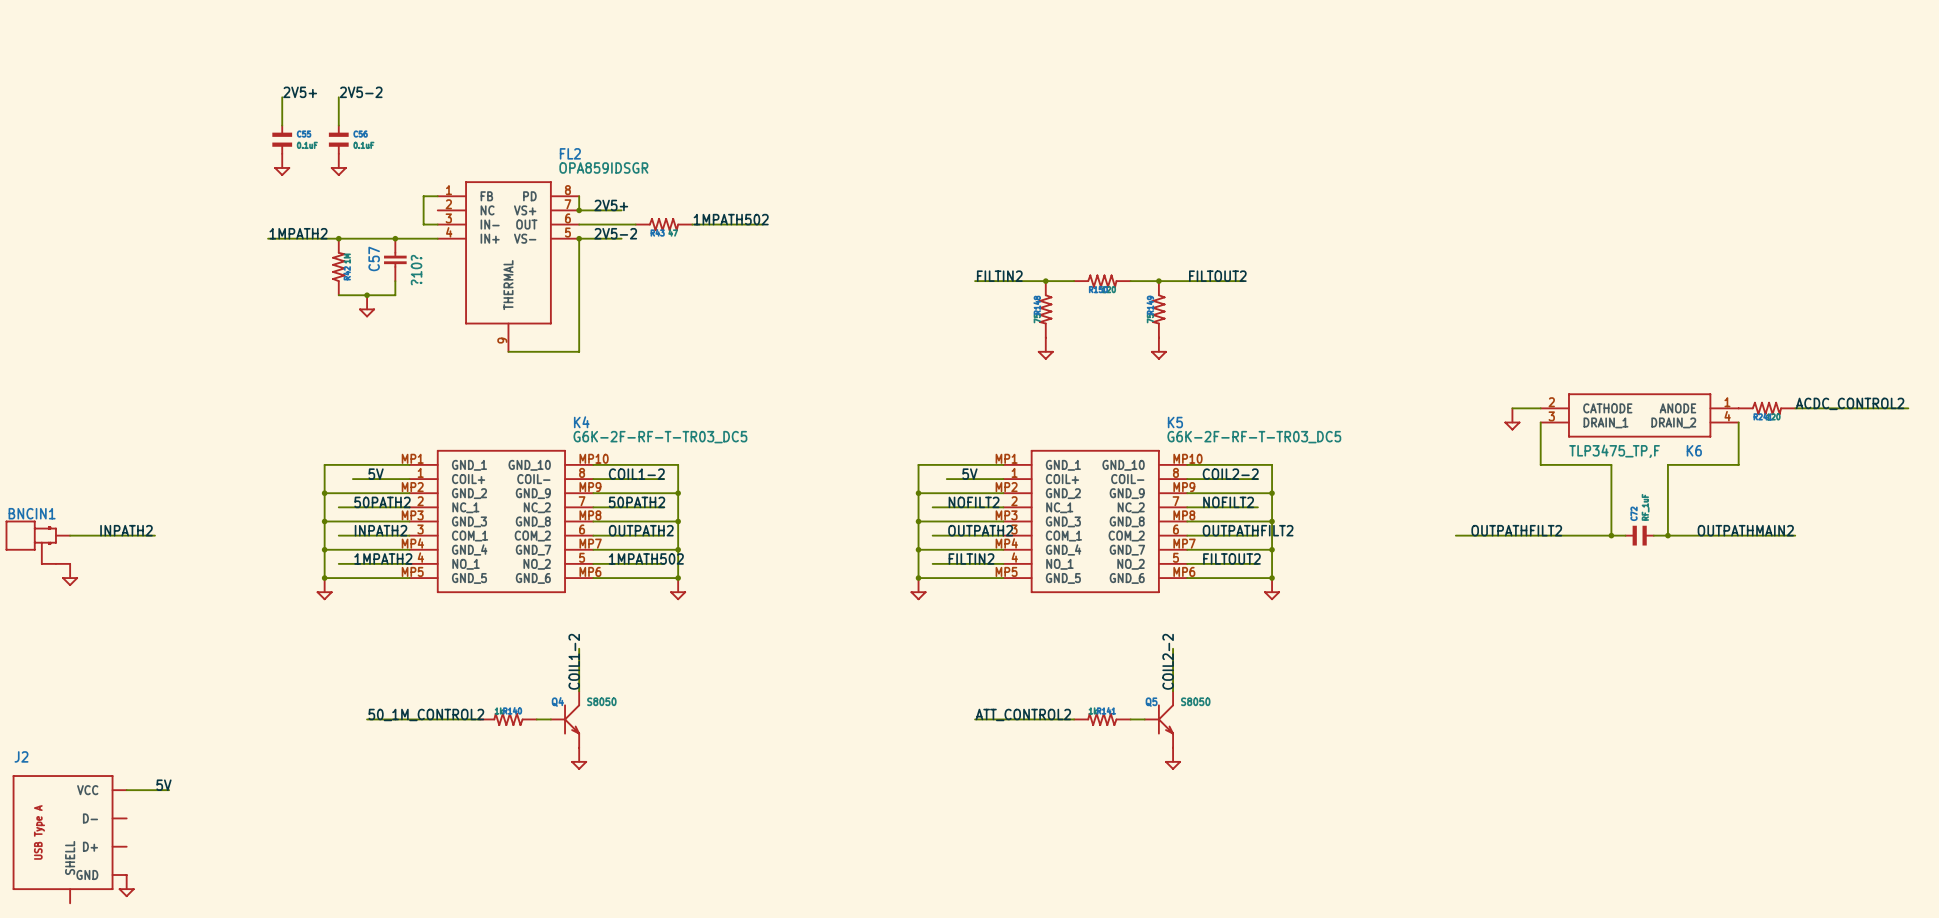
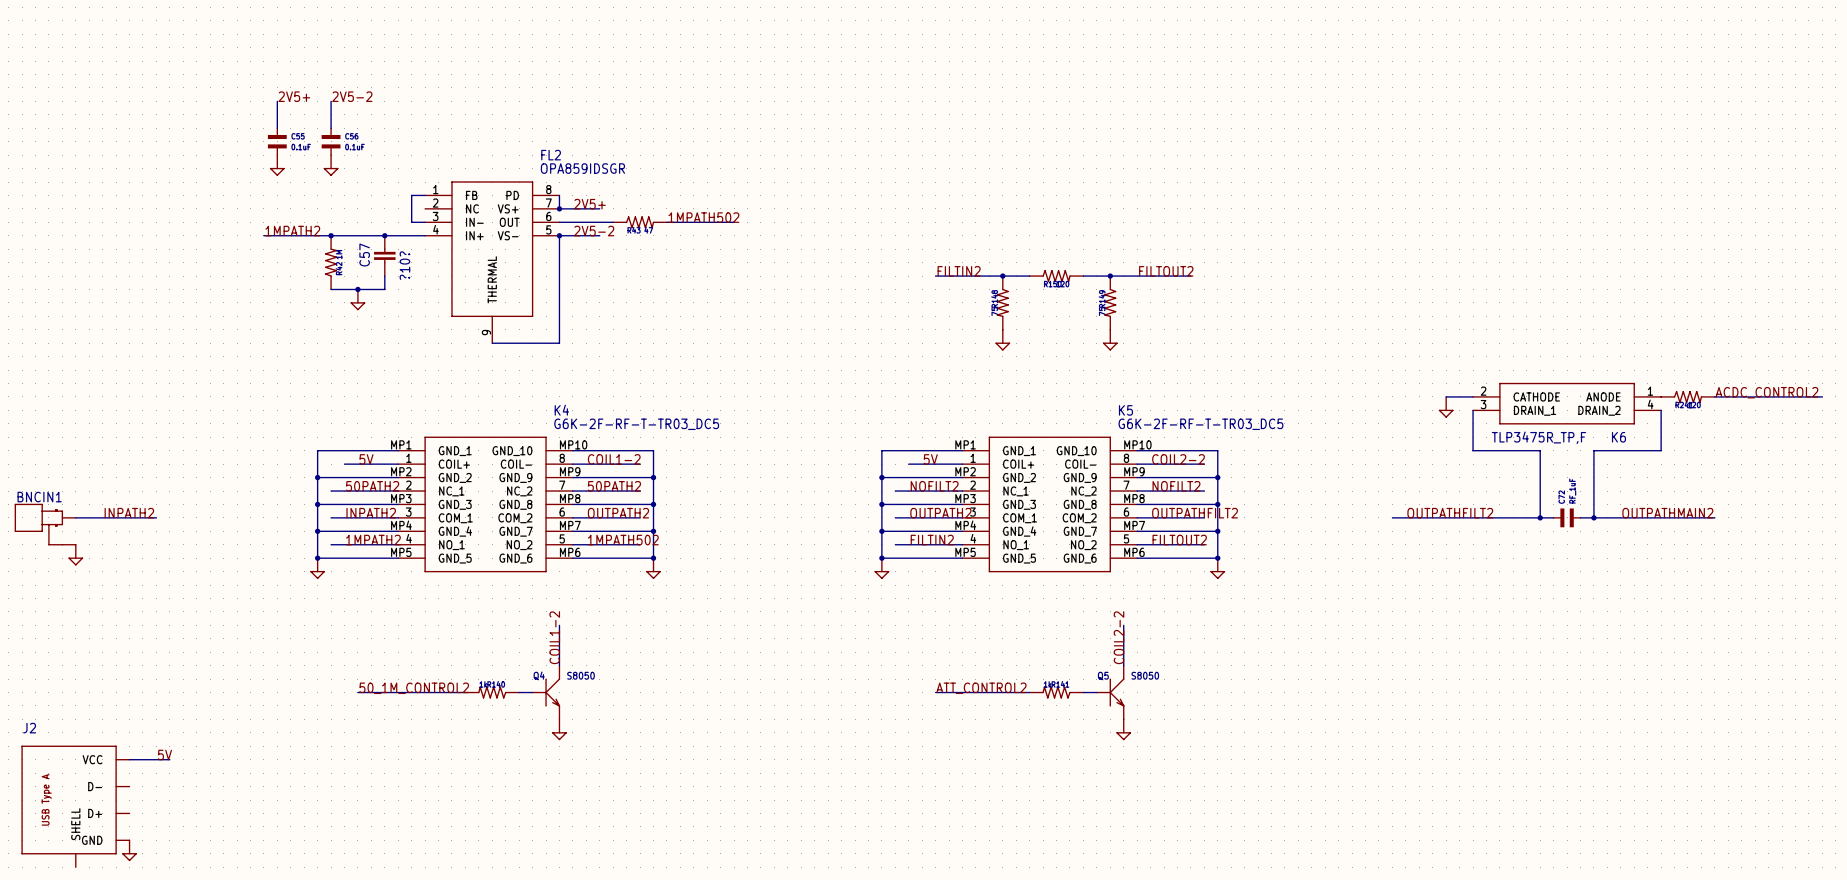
K6 value: TLP3475_TP,F (1614, 451) -> TLP3475R_TP,F (1538, 437)

